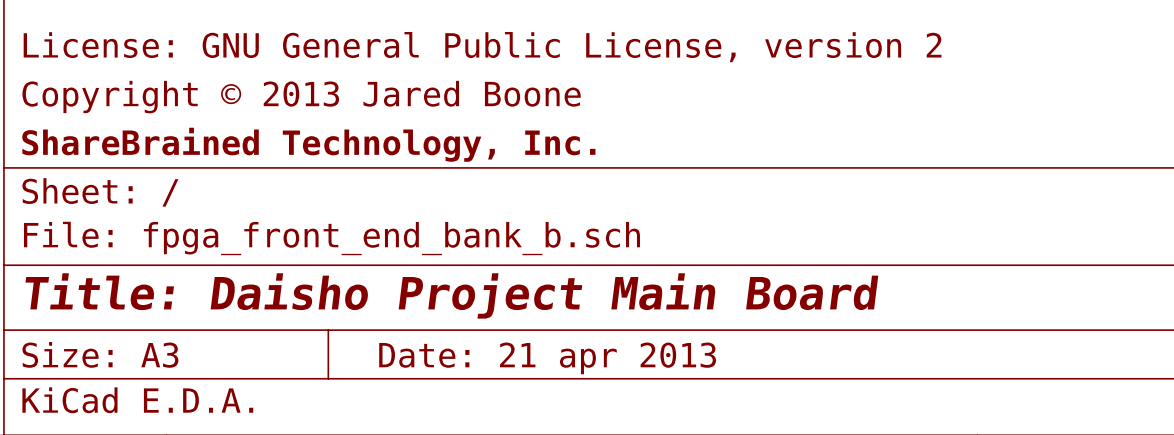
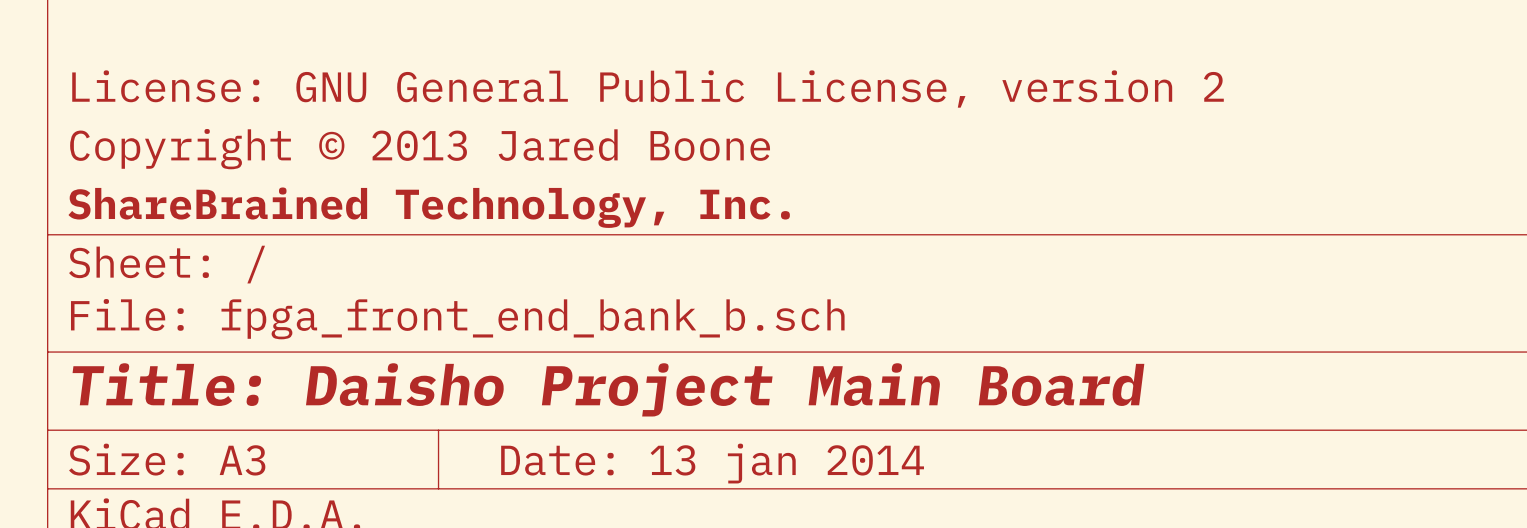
title block: Date: 21 apr 2013 (547, 358) -> Date: 13 jan 2014 (712, 463)

